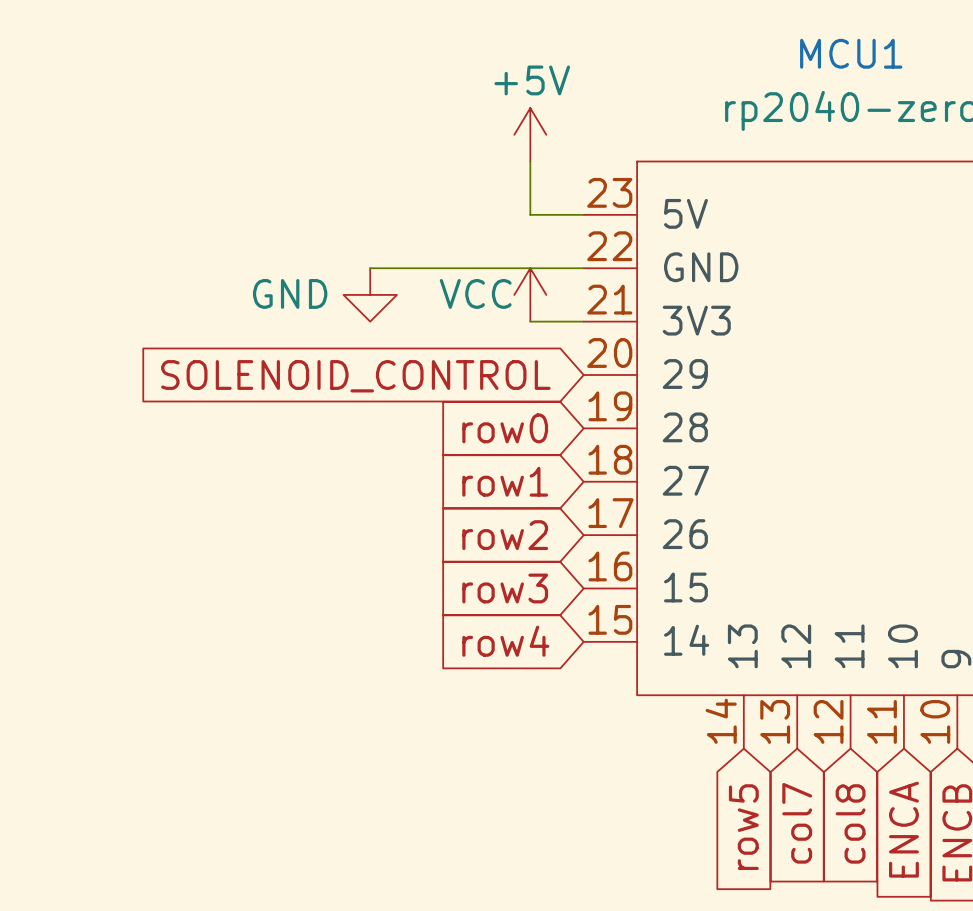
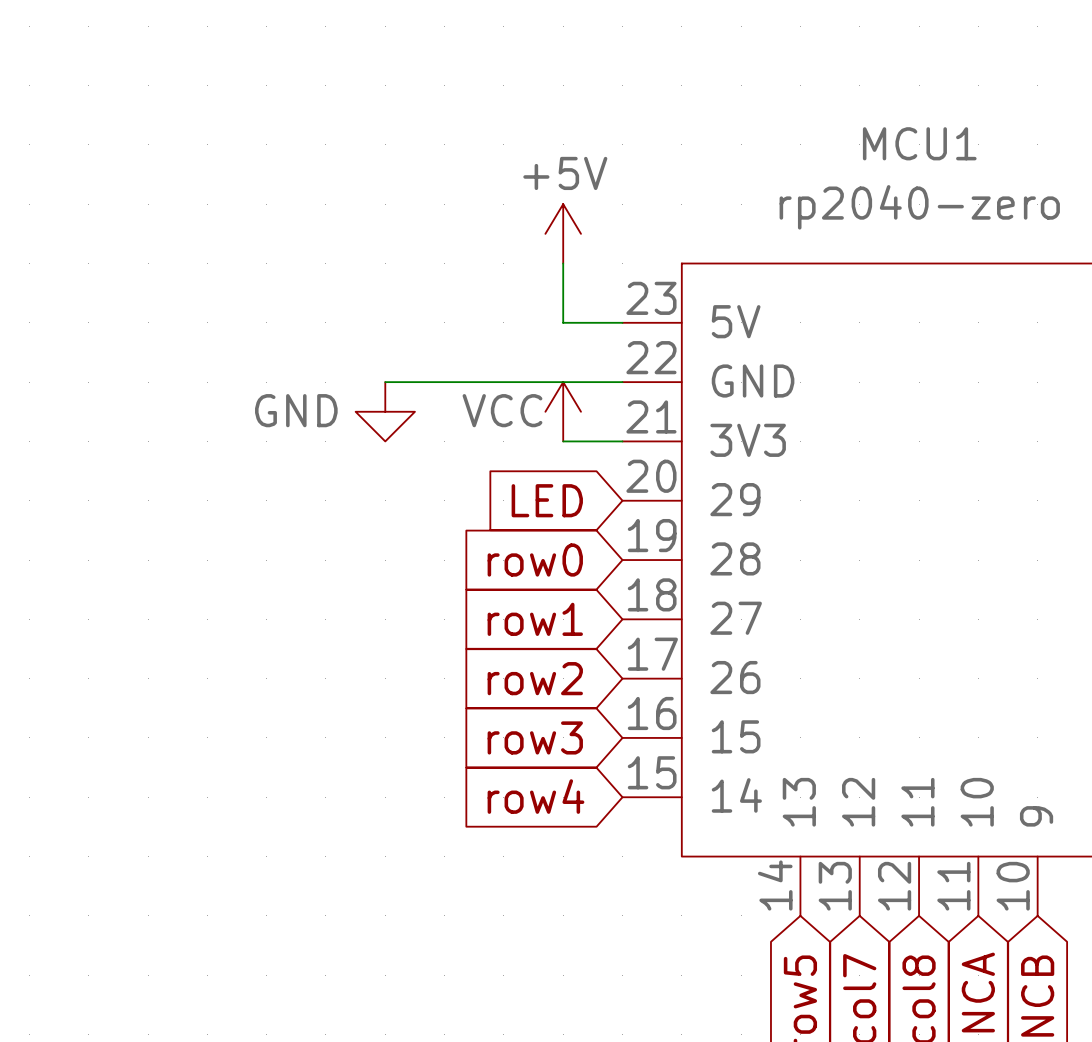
global label: SOLENOID_CONTROL (355, 376) -> LED (547, 500)

